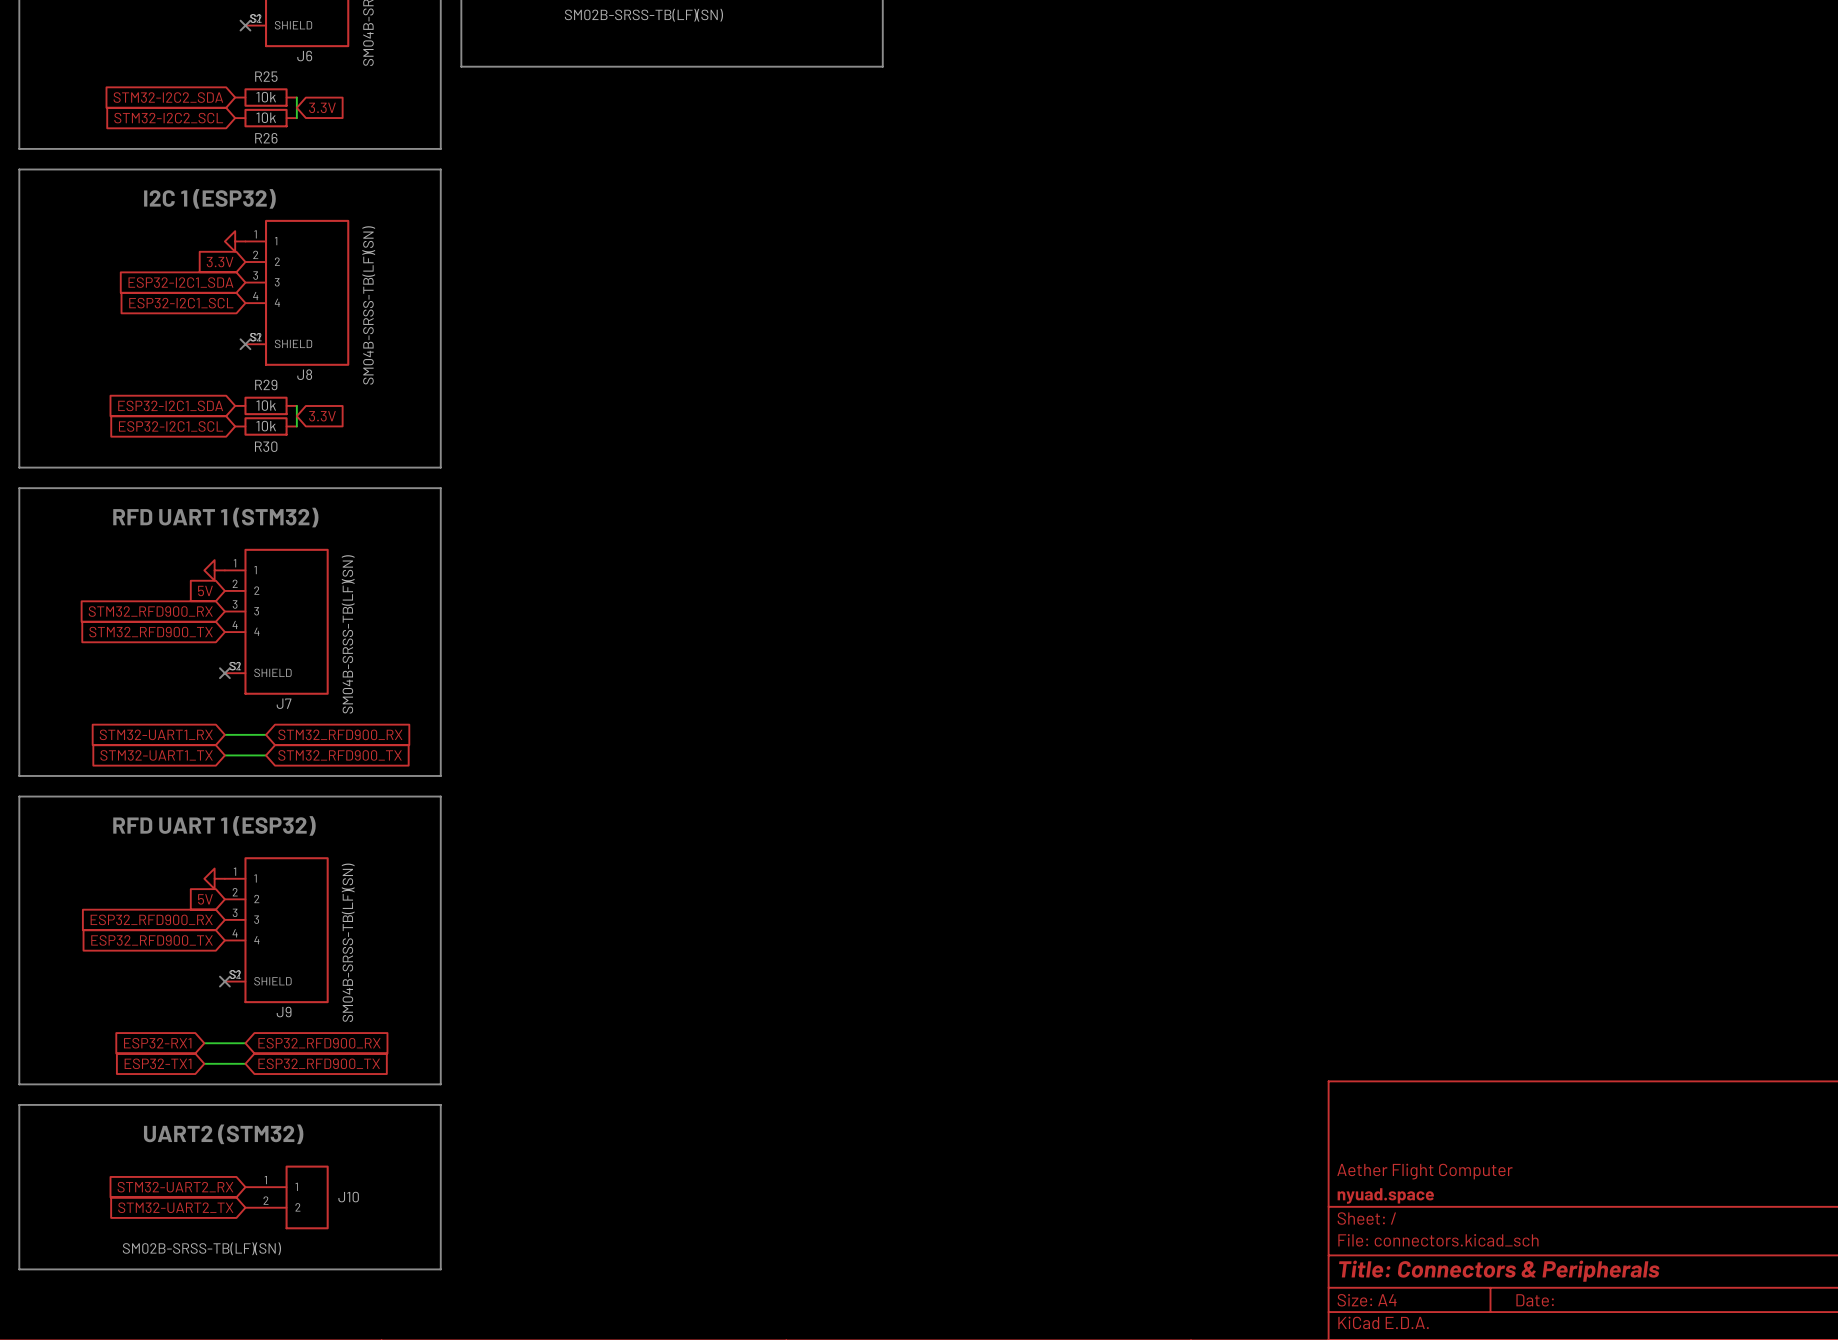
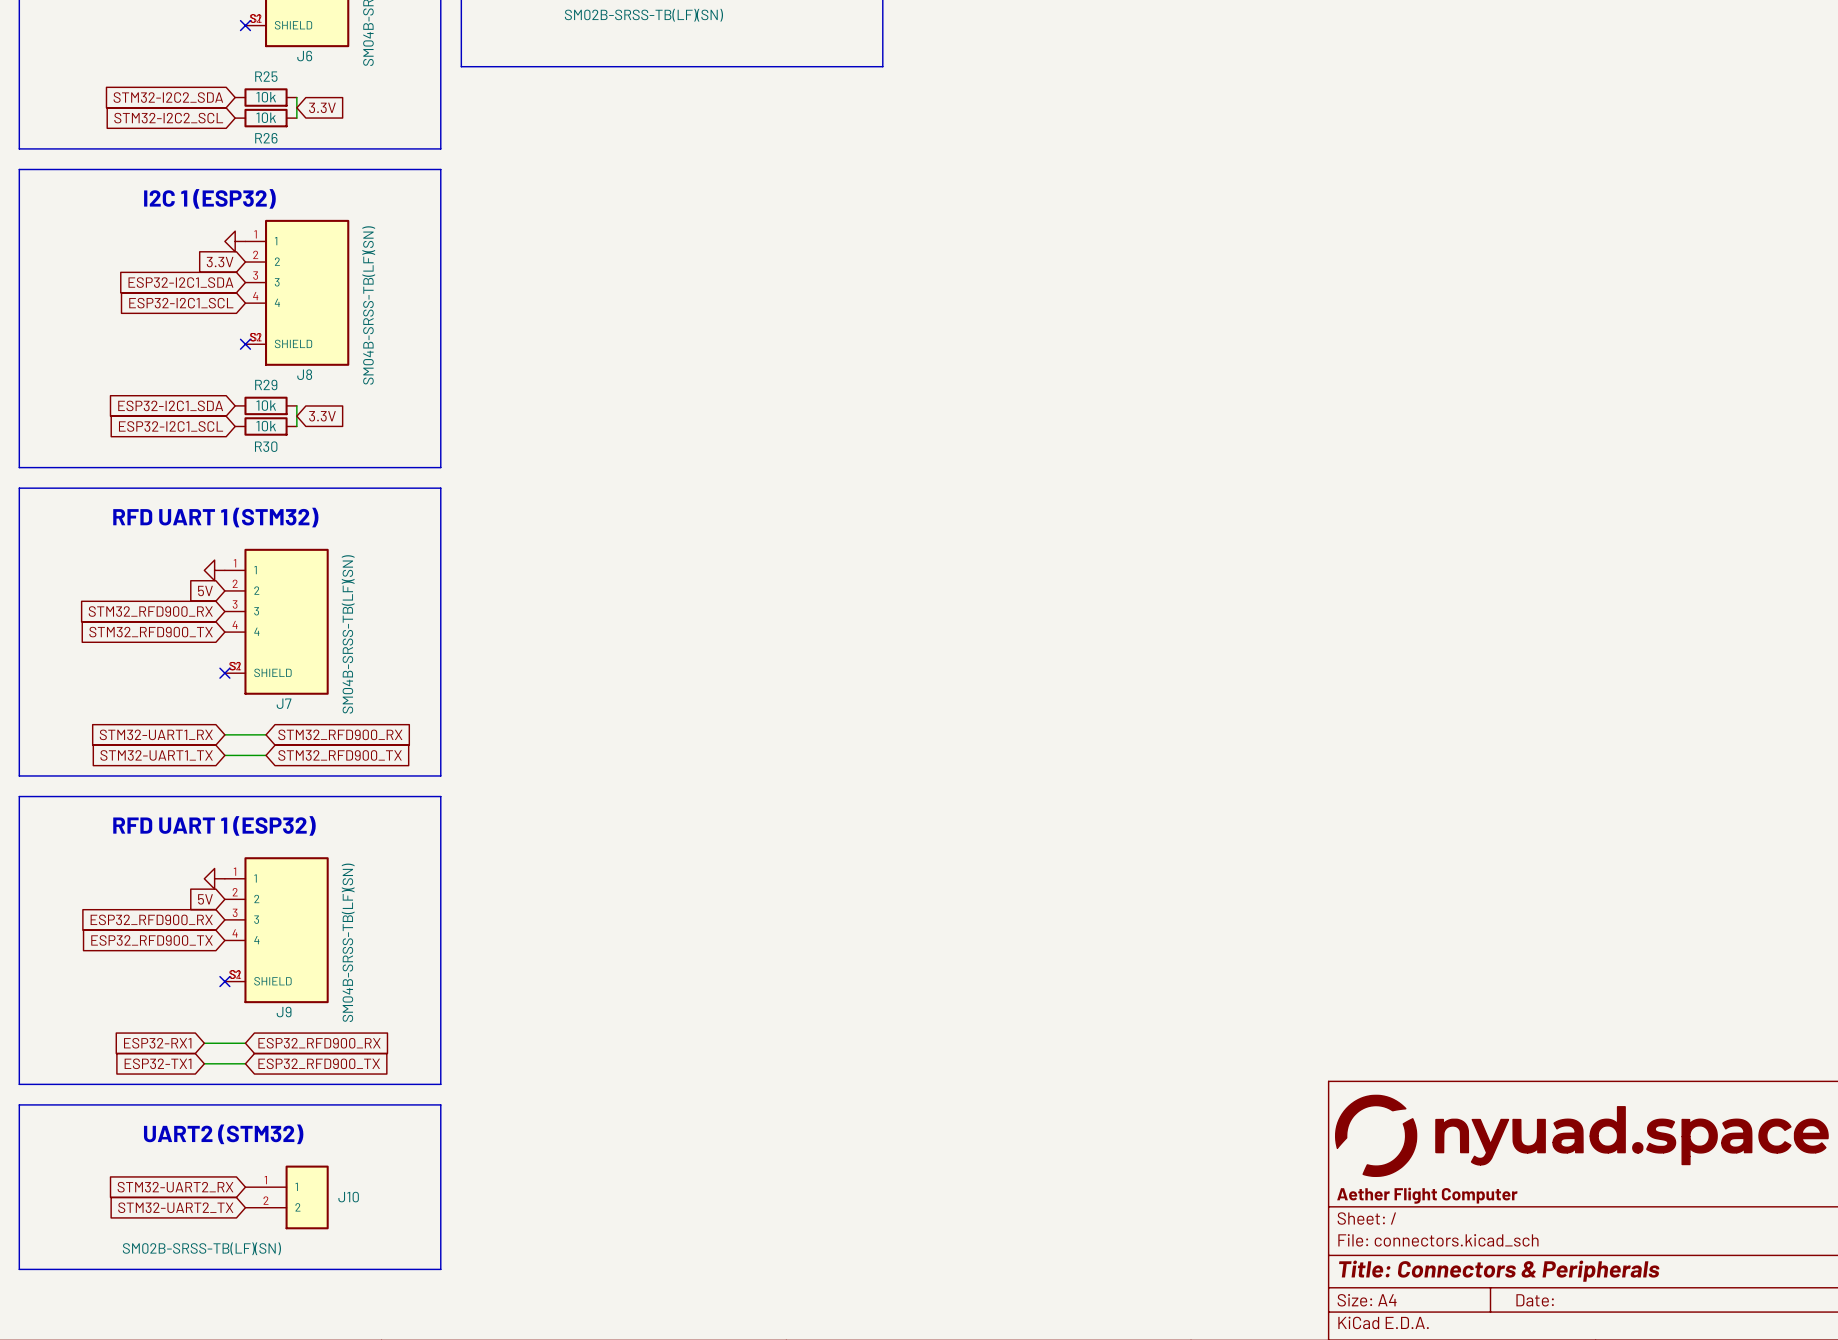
power symbol: none -> (1581, 1135)
title block: Aether Flight Computer (1424, 1171) -> none
title block: nyuad.space (1385, 1195) -> Aether Flight Computer (1427, 1195)

